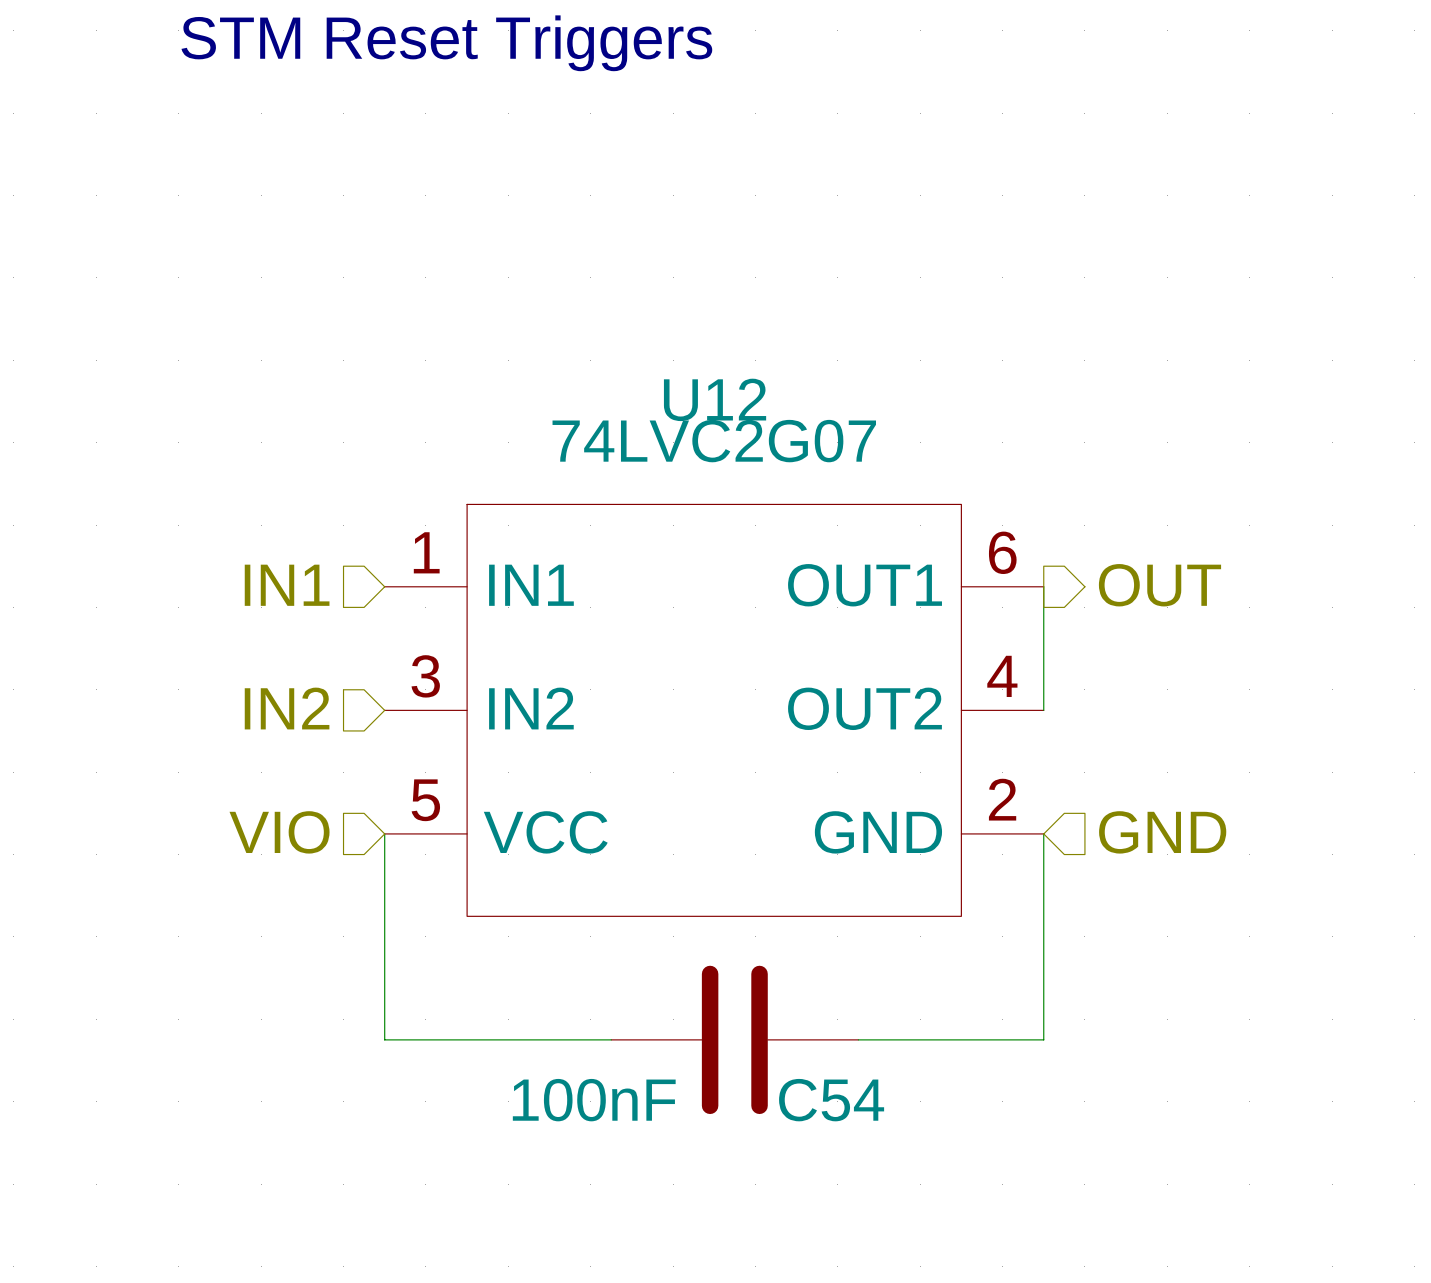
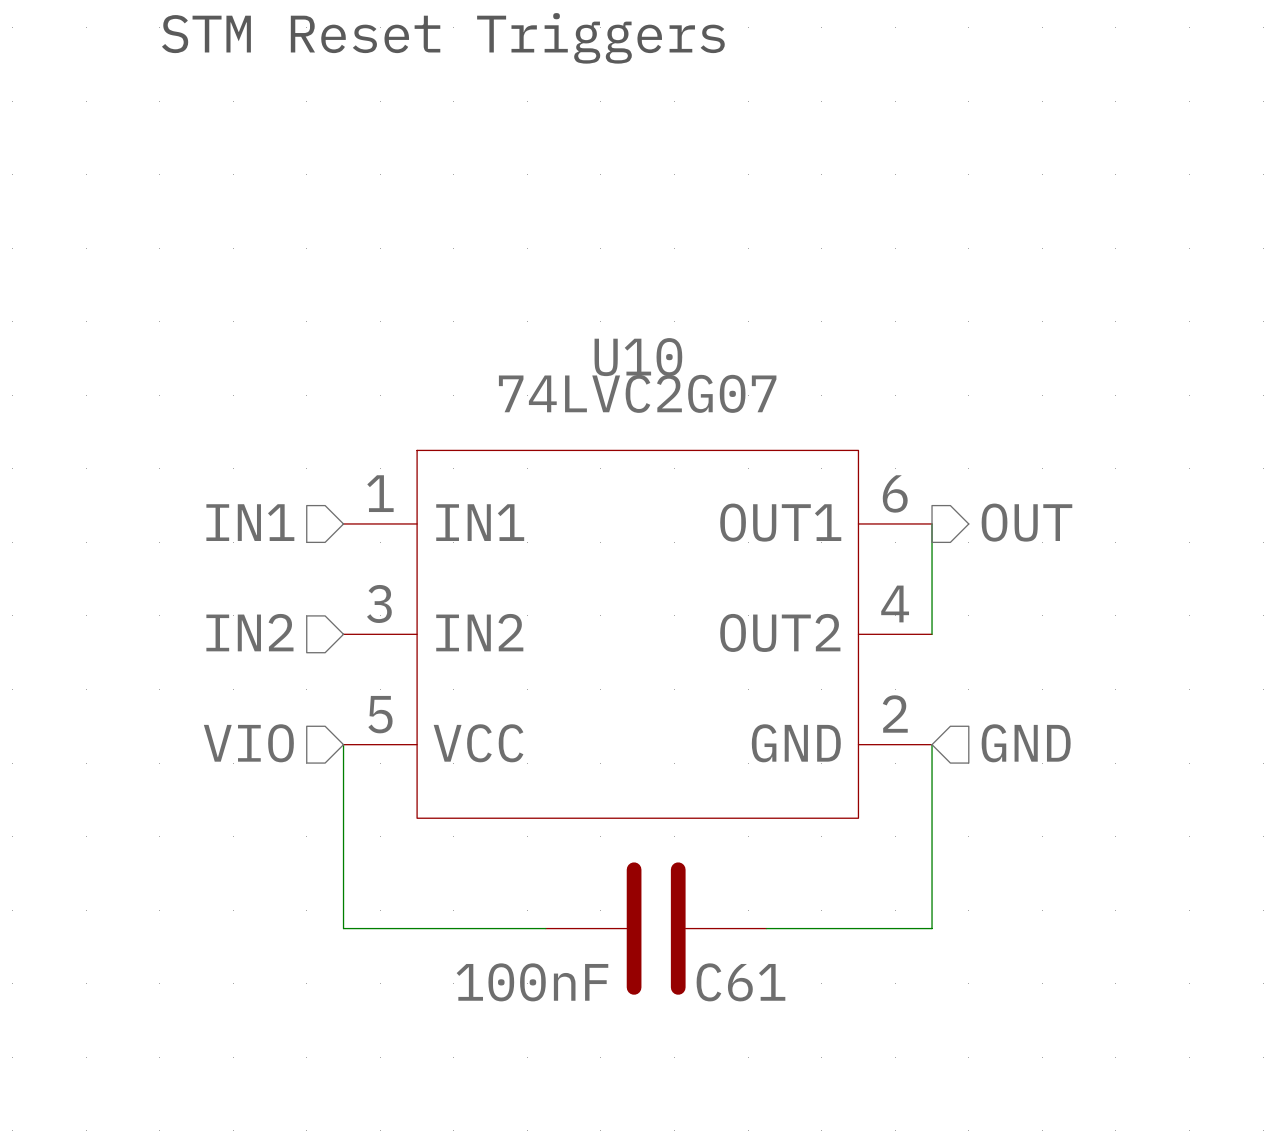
U12 name: U12 (715, 399) -> U10 (638, 357)
C54 name: C54 (831, 1100) -> C61 (740, 982)

